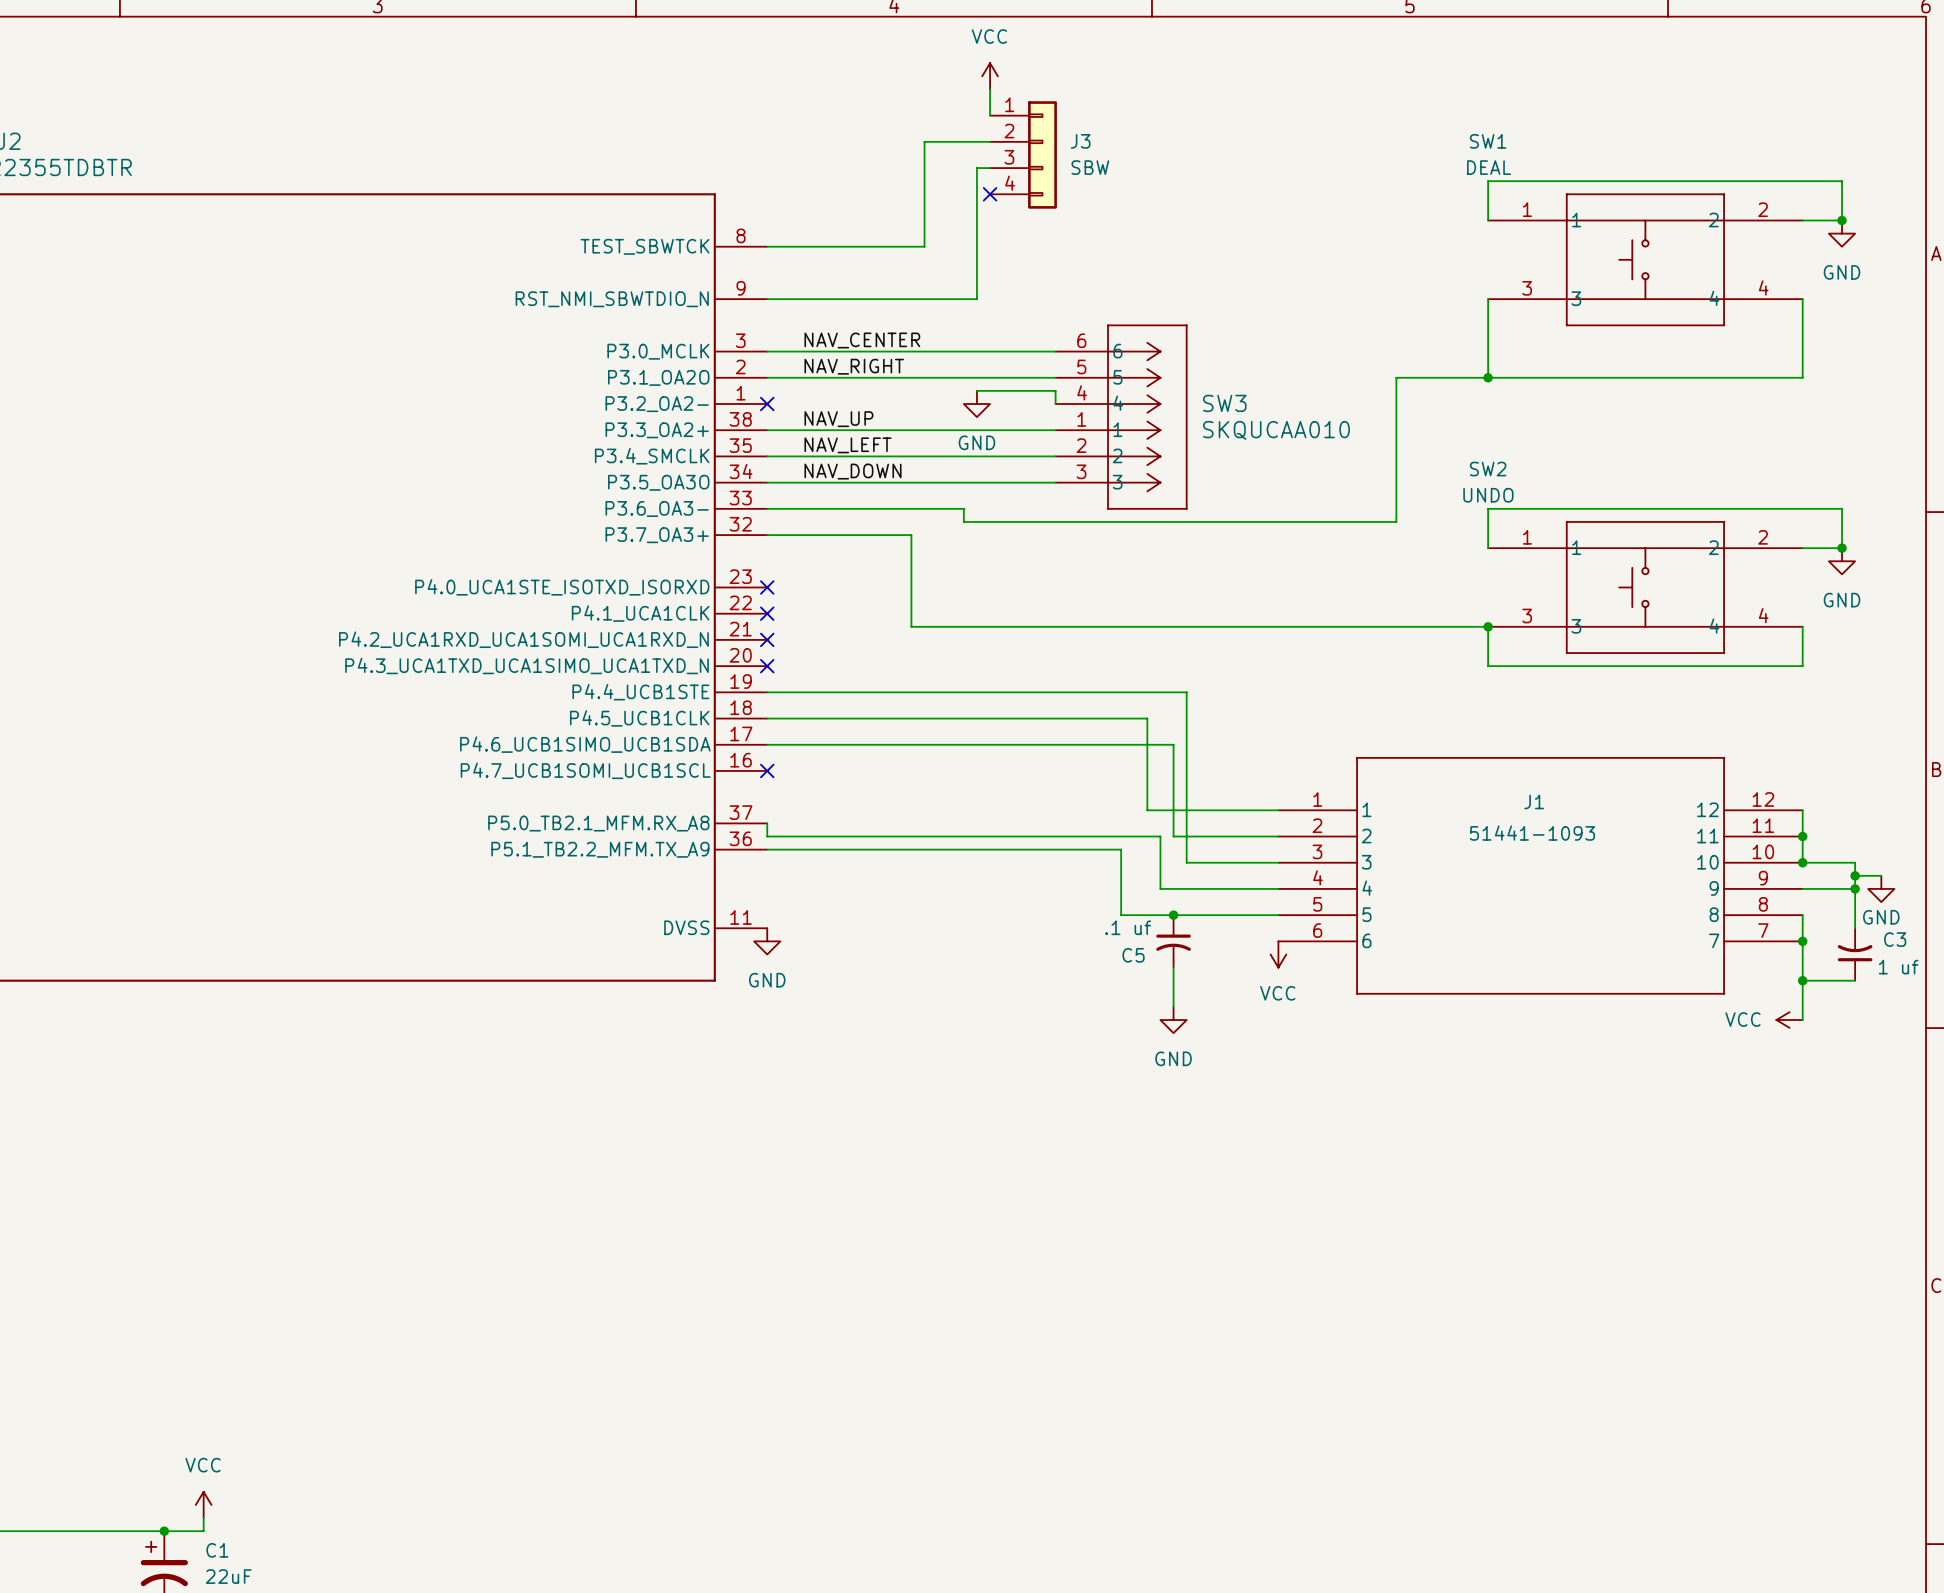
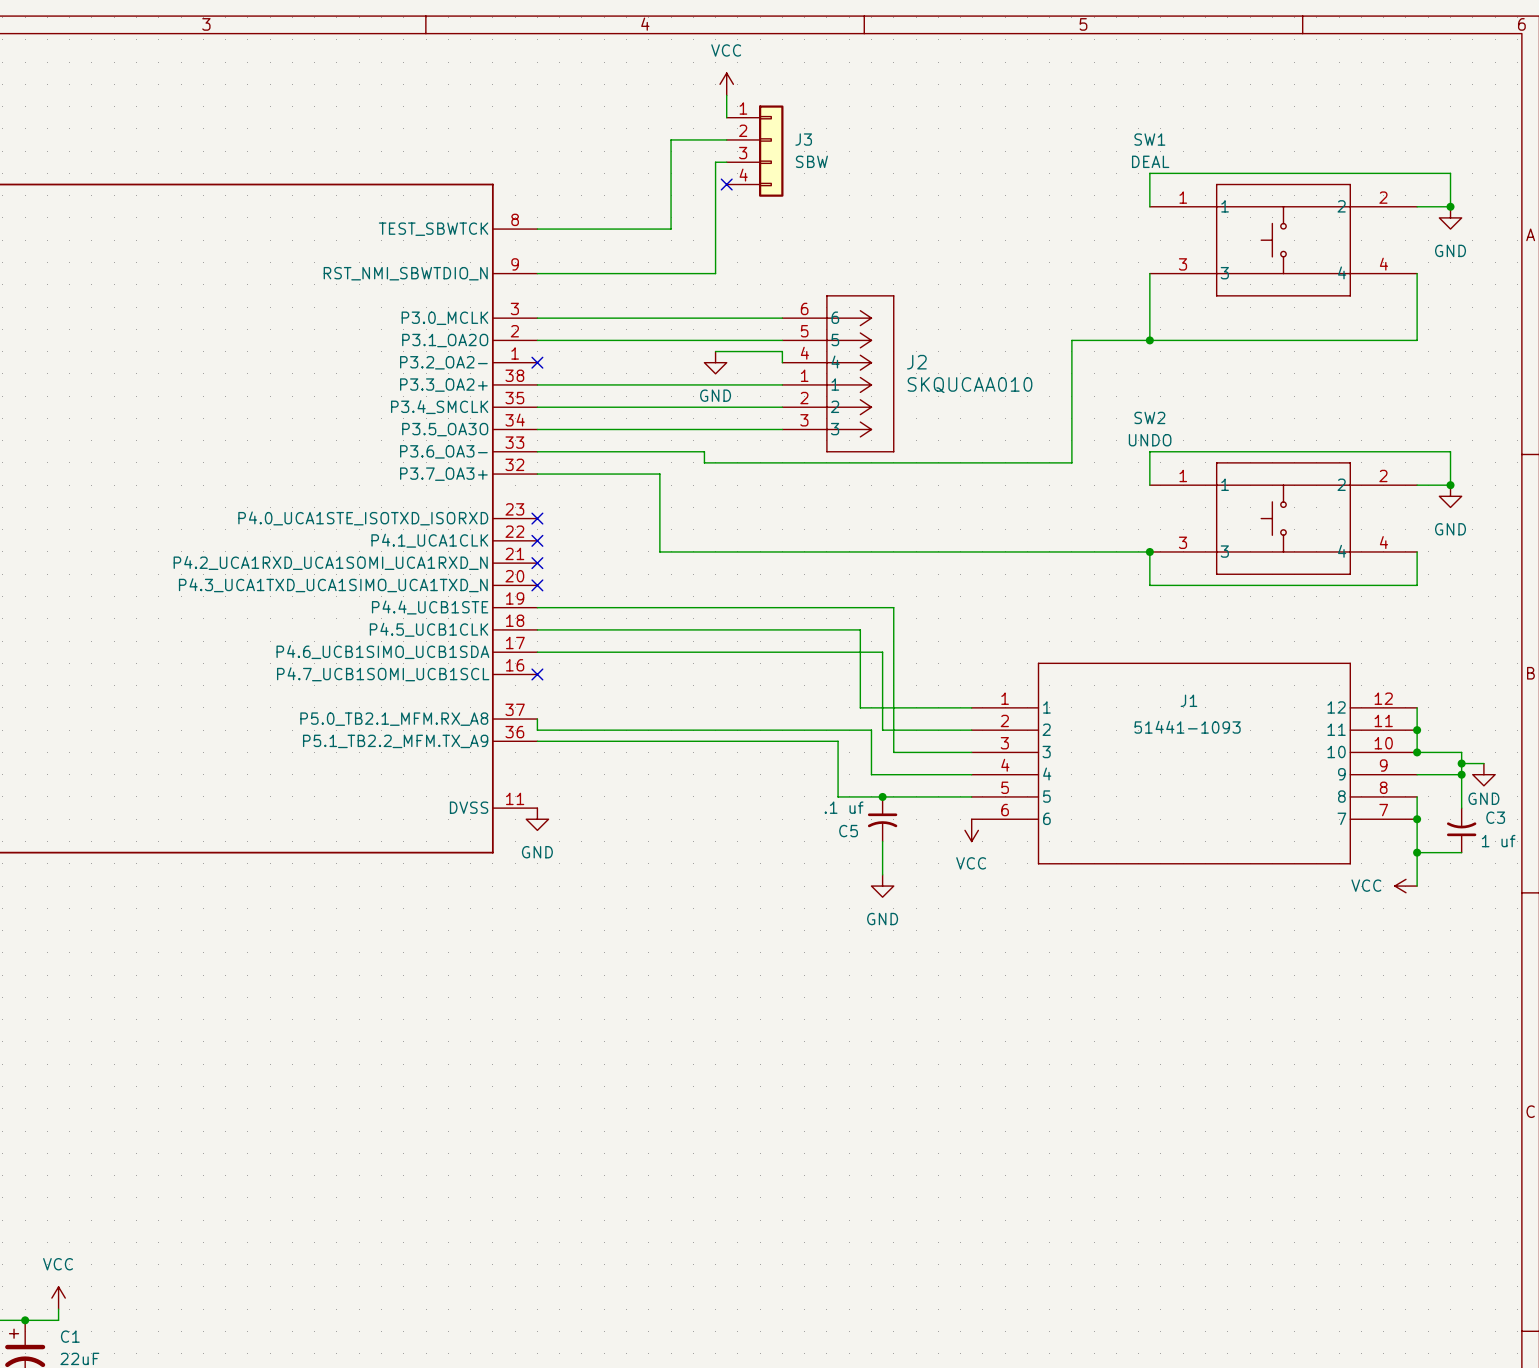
label: NAV_CENTER (862, 340) -> none
label: NAV_RIGHT (854, 366) -> none
SW3 name: SW3 (1224, 403) -> J2 (916, 362)
label: NAV_UP (838, 419) -> none
label: NAV_LEFT (848, 445) -> none
label: NAV_DOWN (853, 471) -> none

